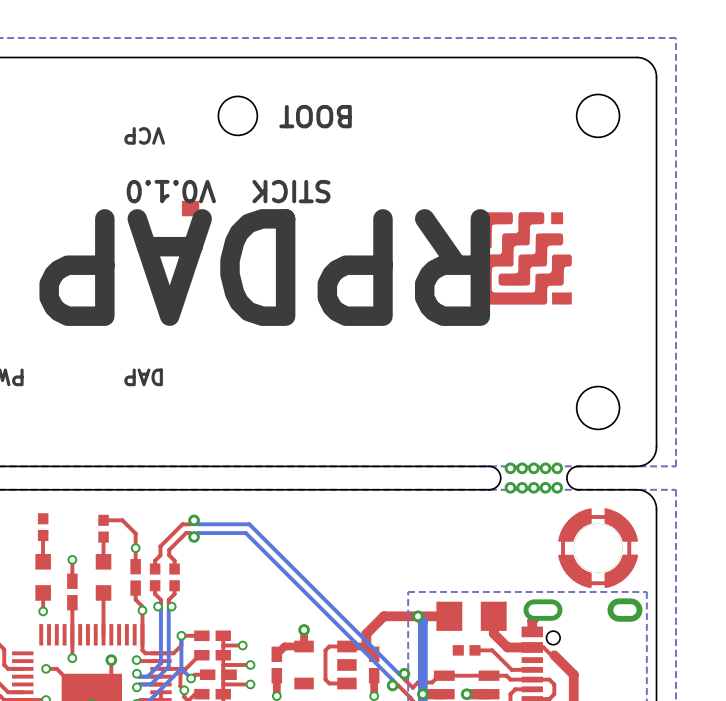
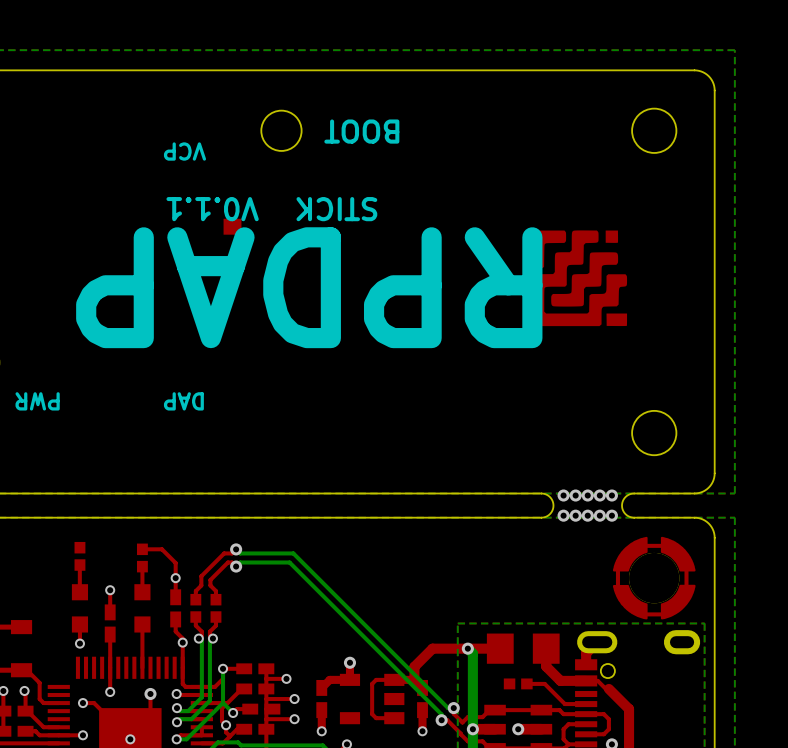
text: V0.1.0 (171, 191) -> V0.1.1 (212, 209)

